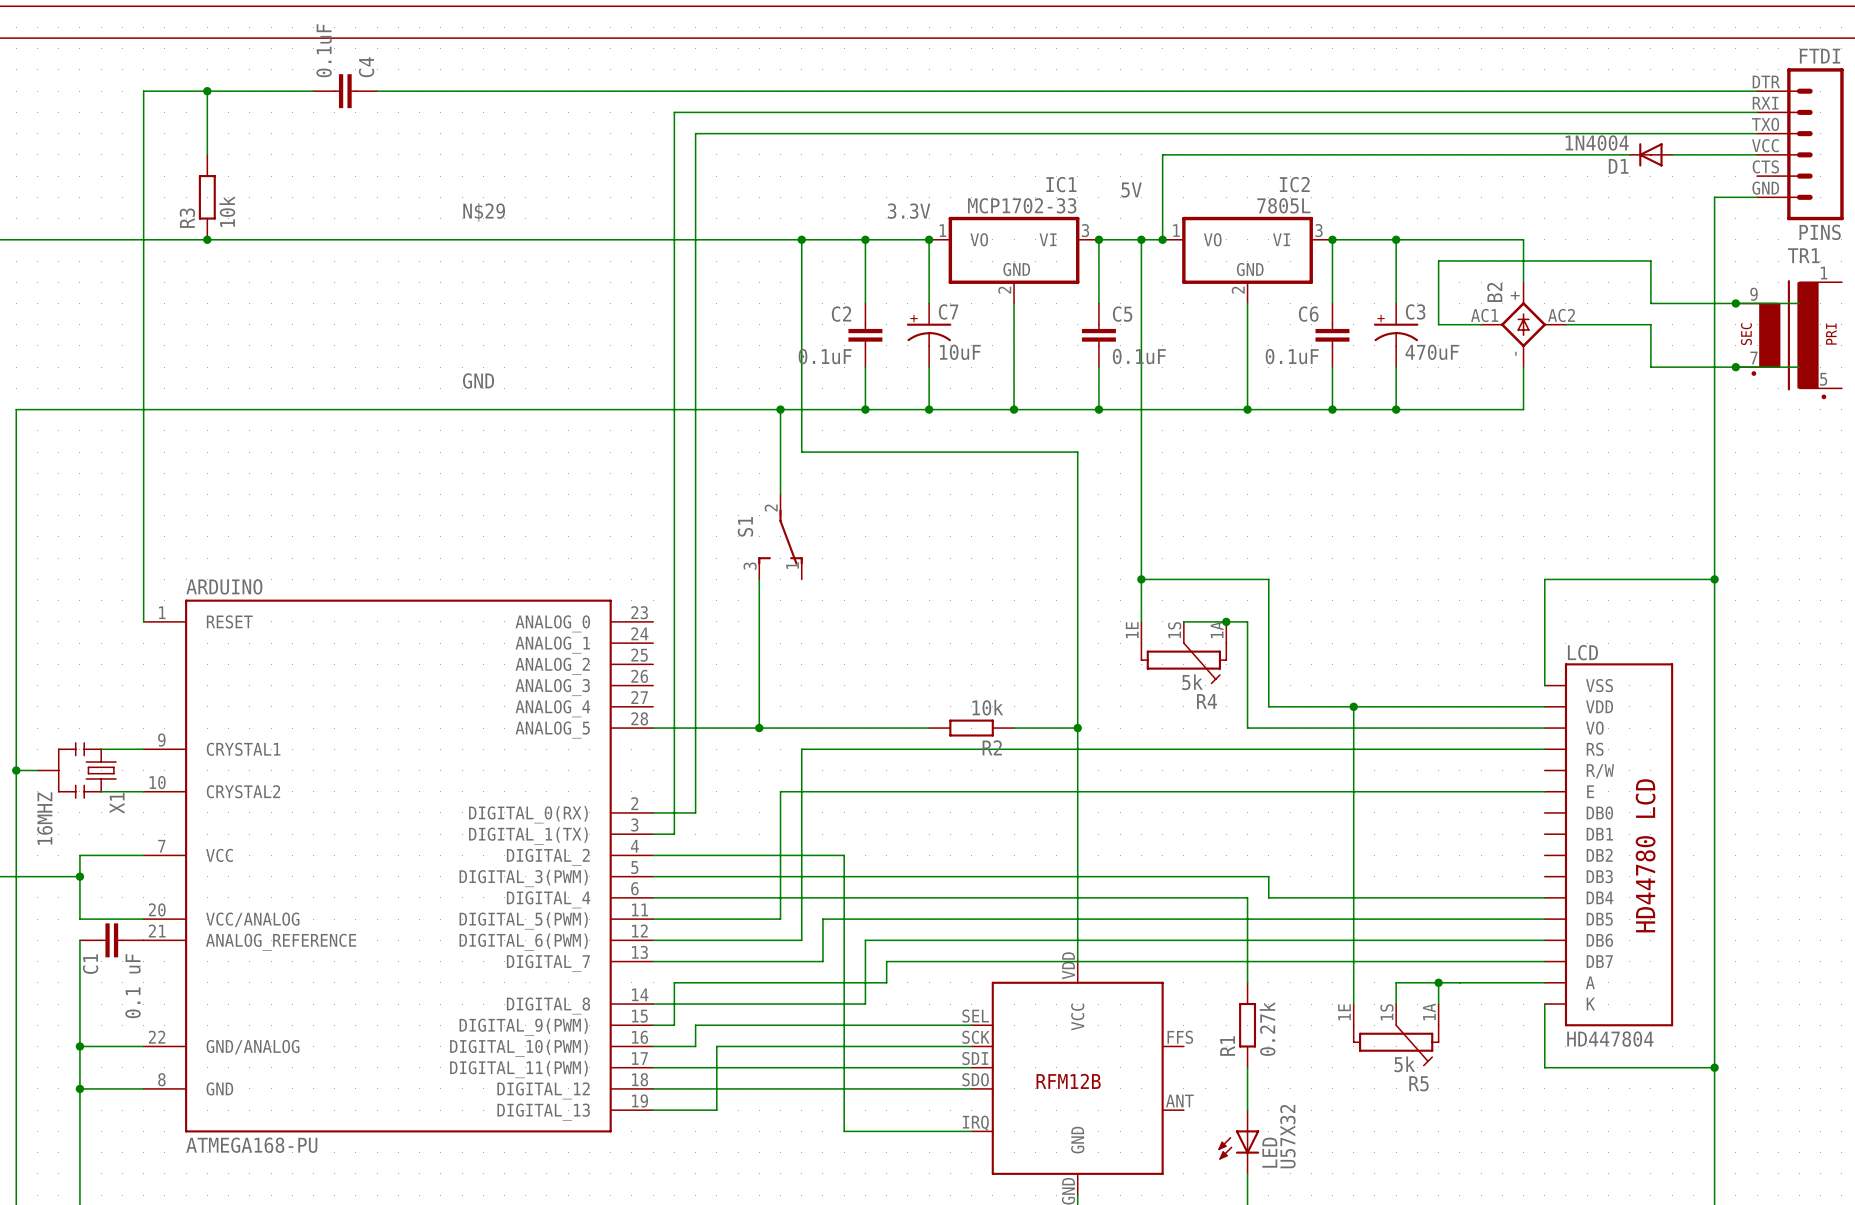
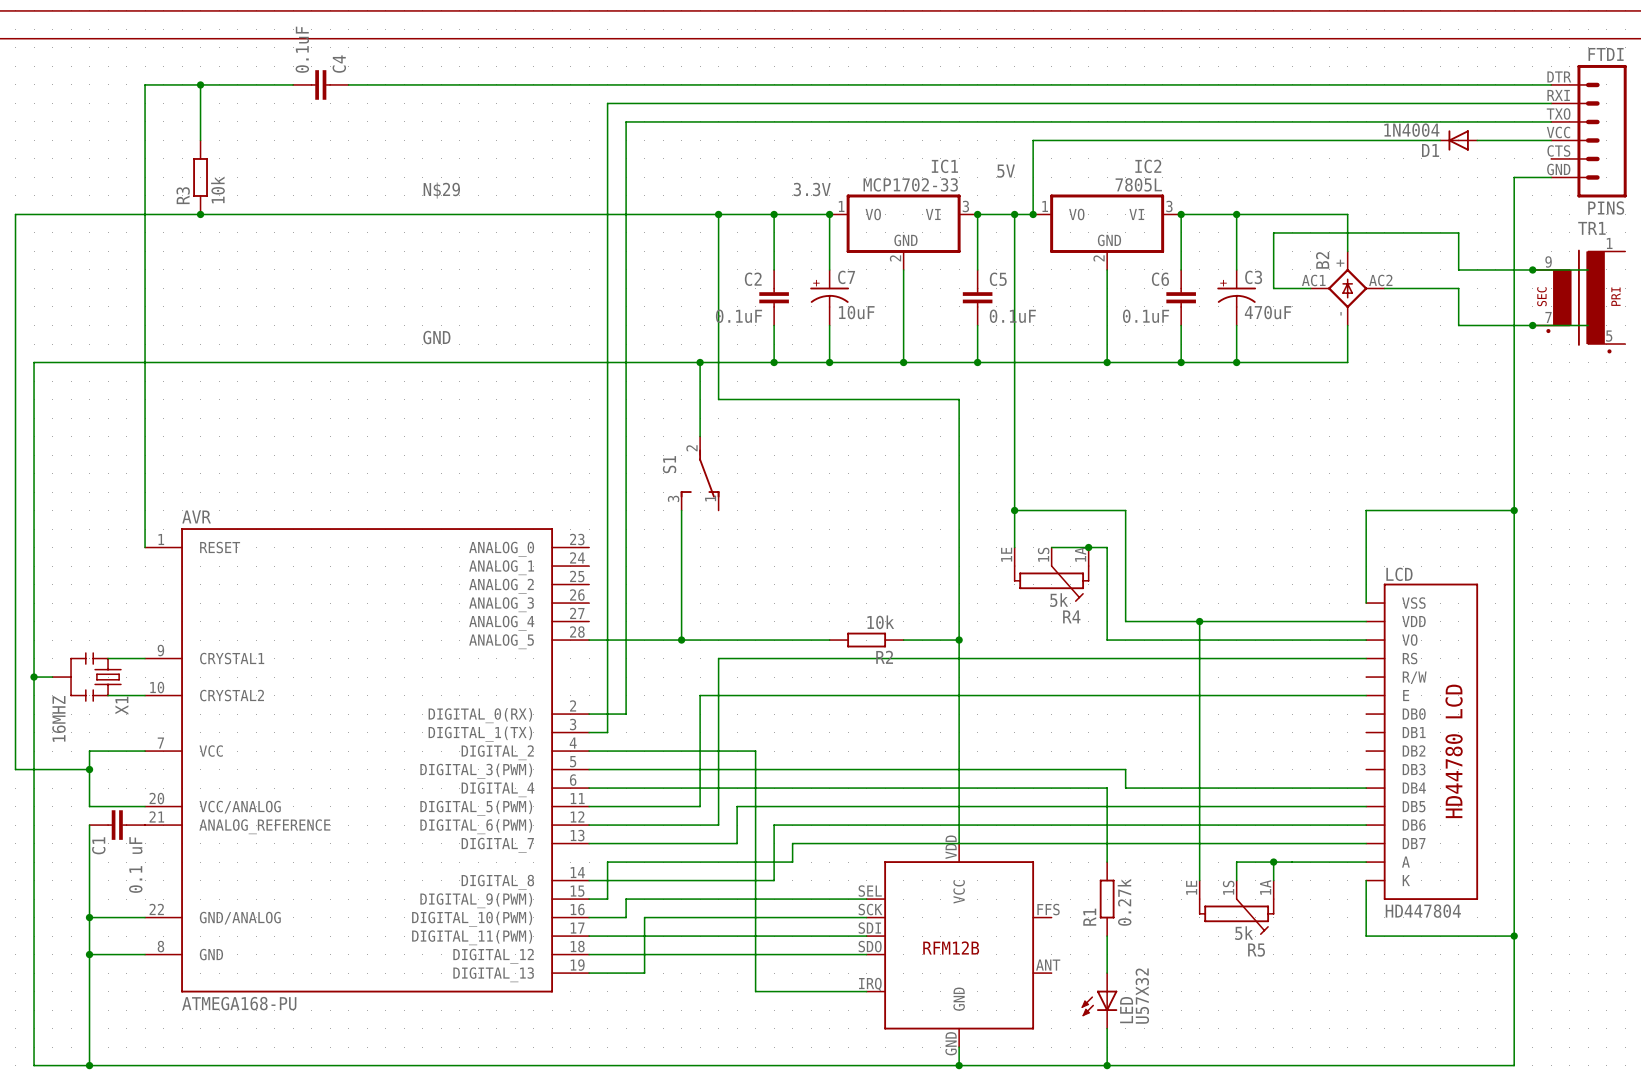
ARDUINO name: ARDUINO (224, 586) -> AVR (196, 516)

